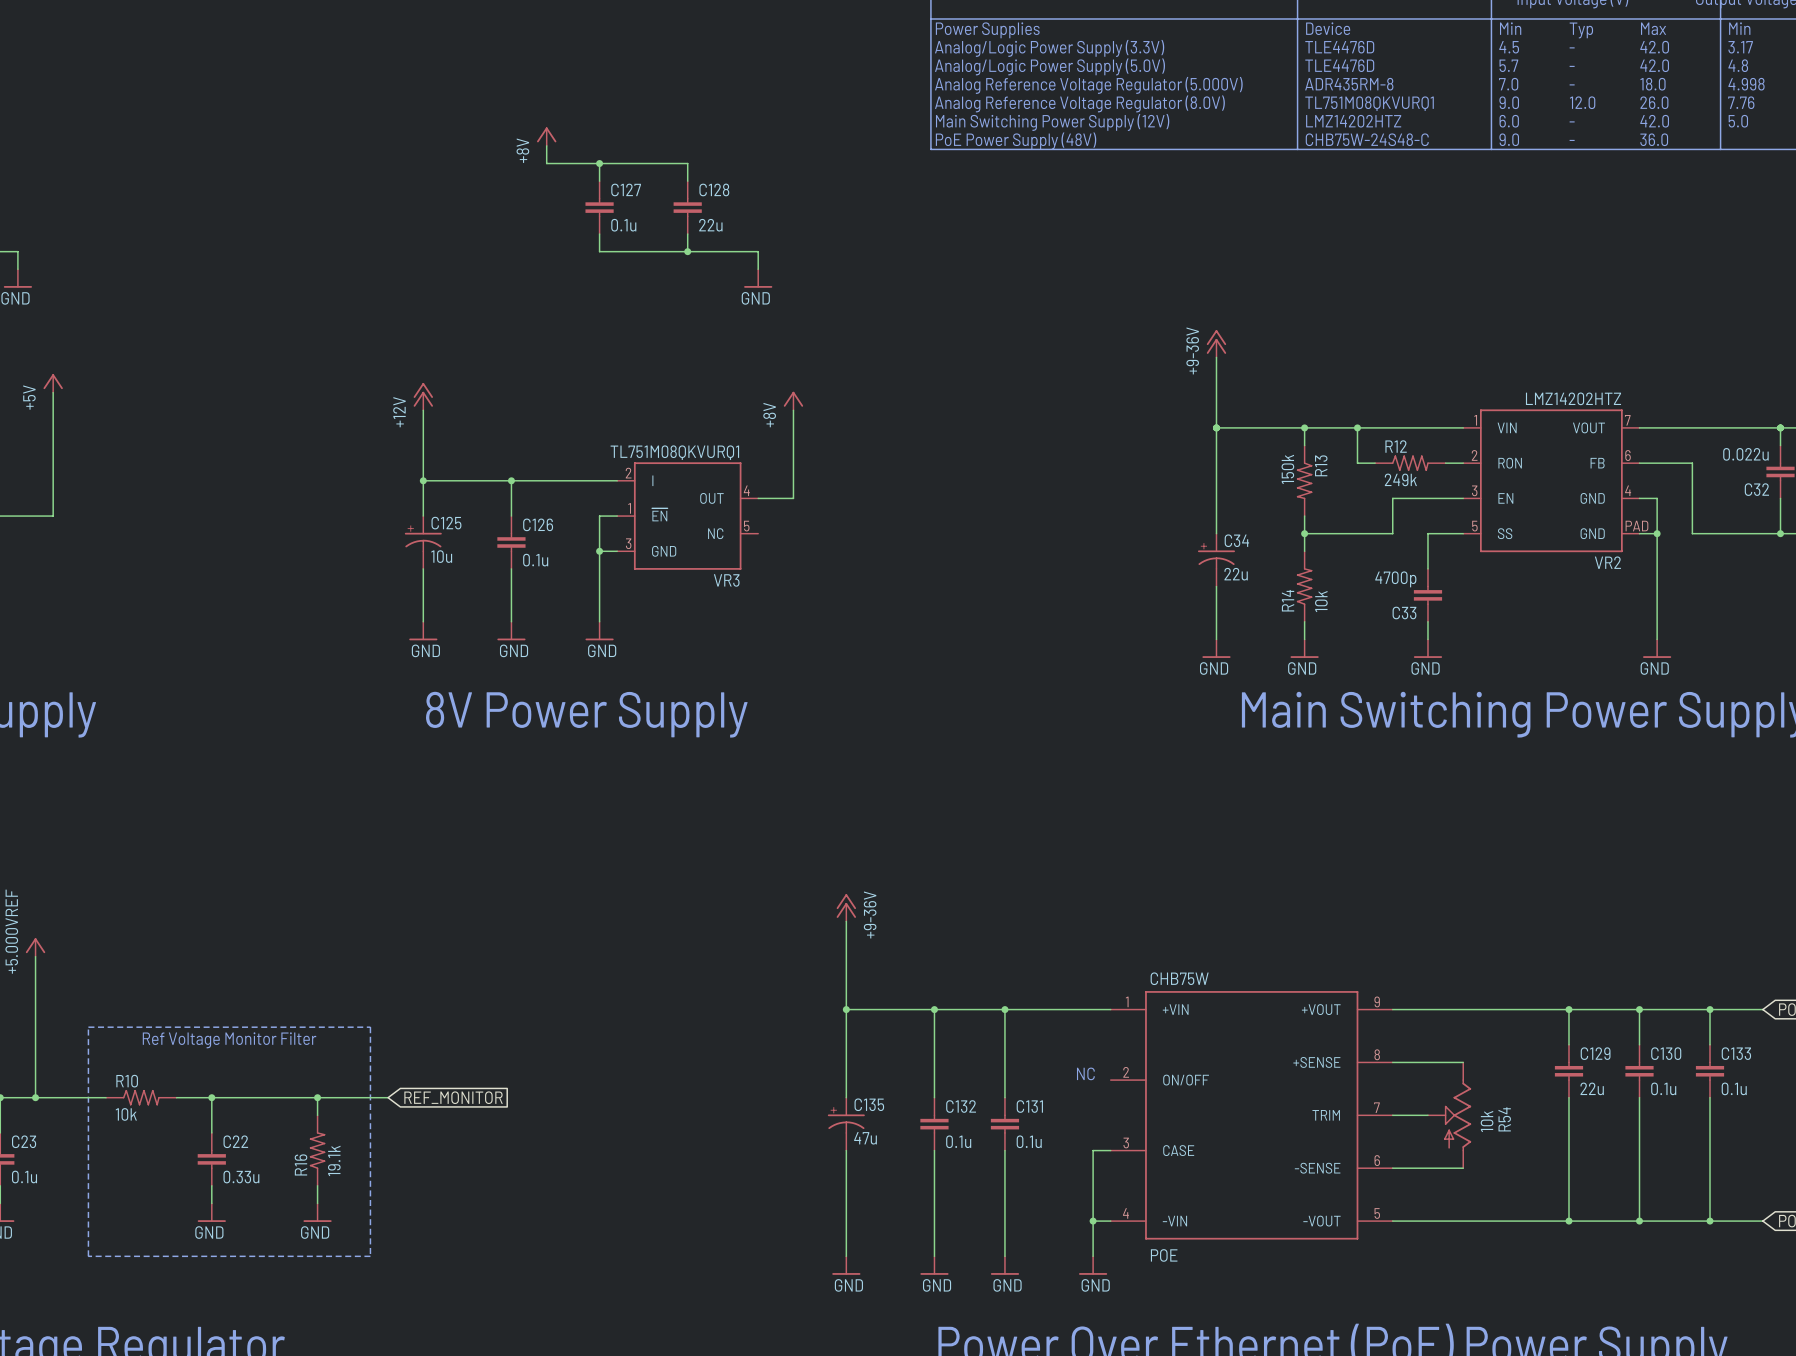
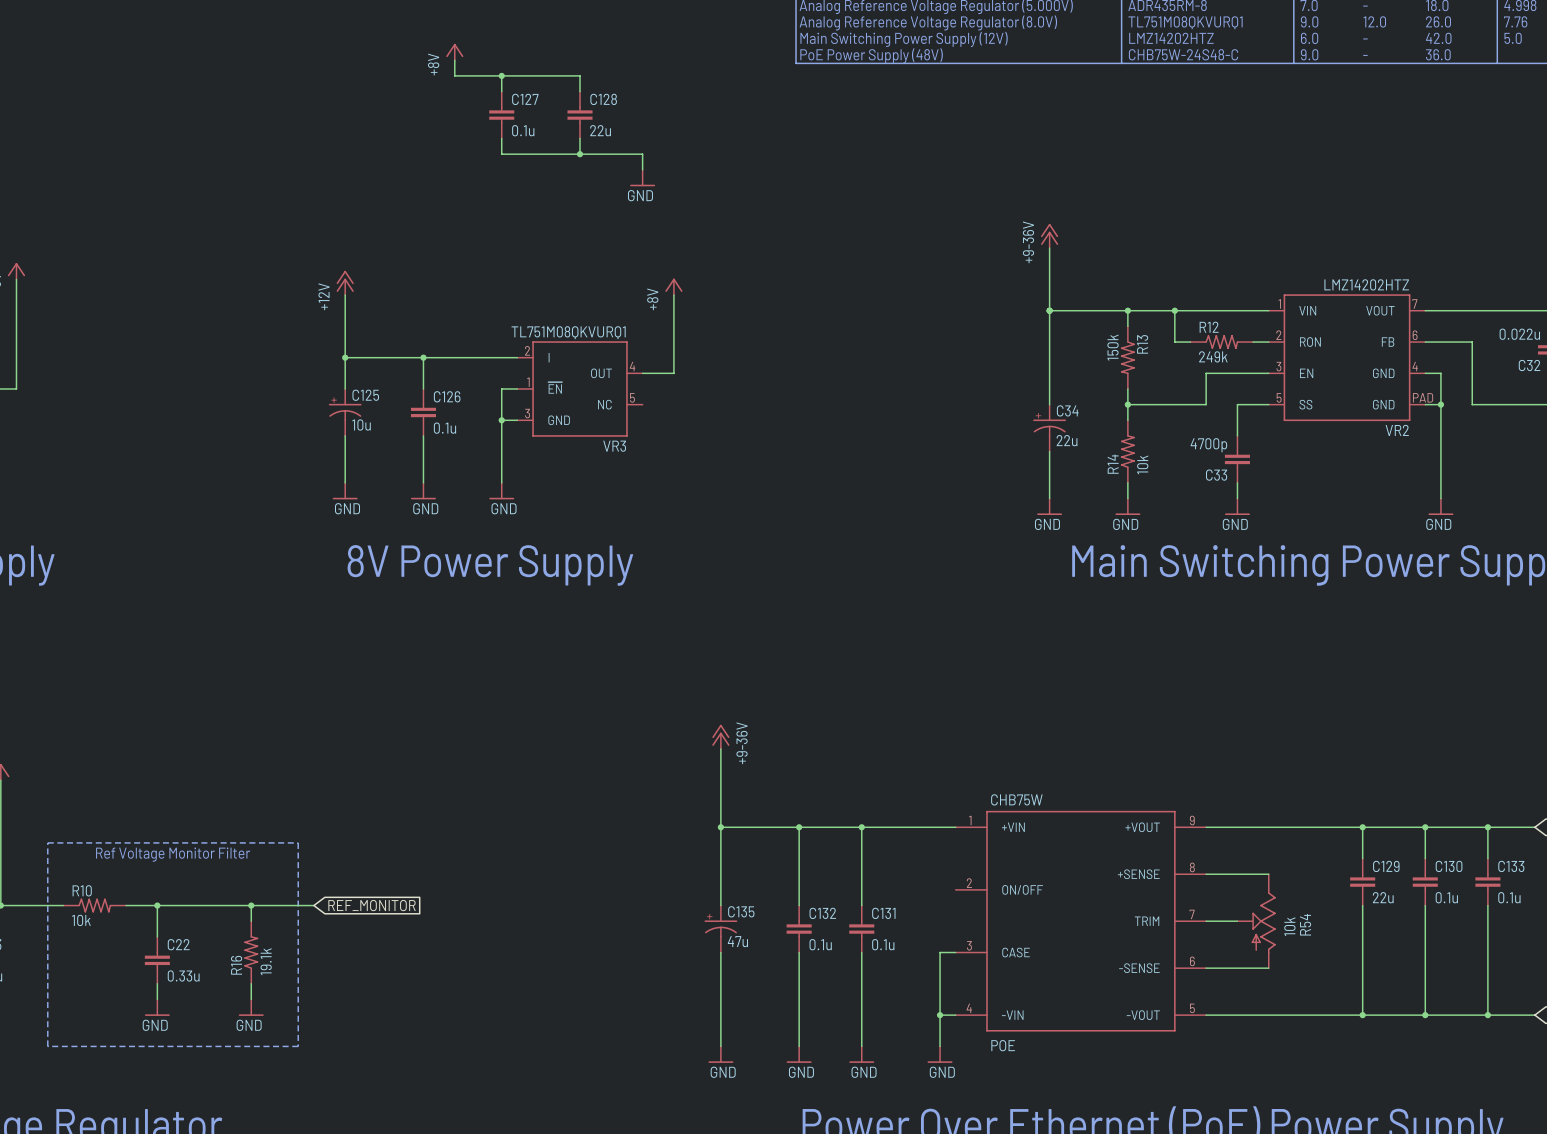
text: NC (1085, 1073) -> none

